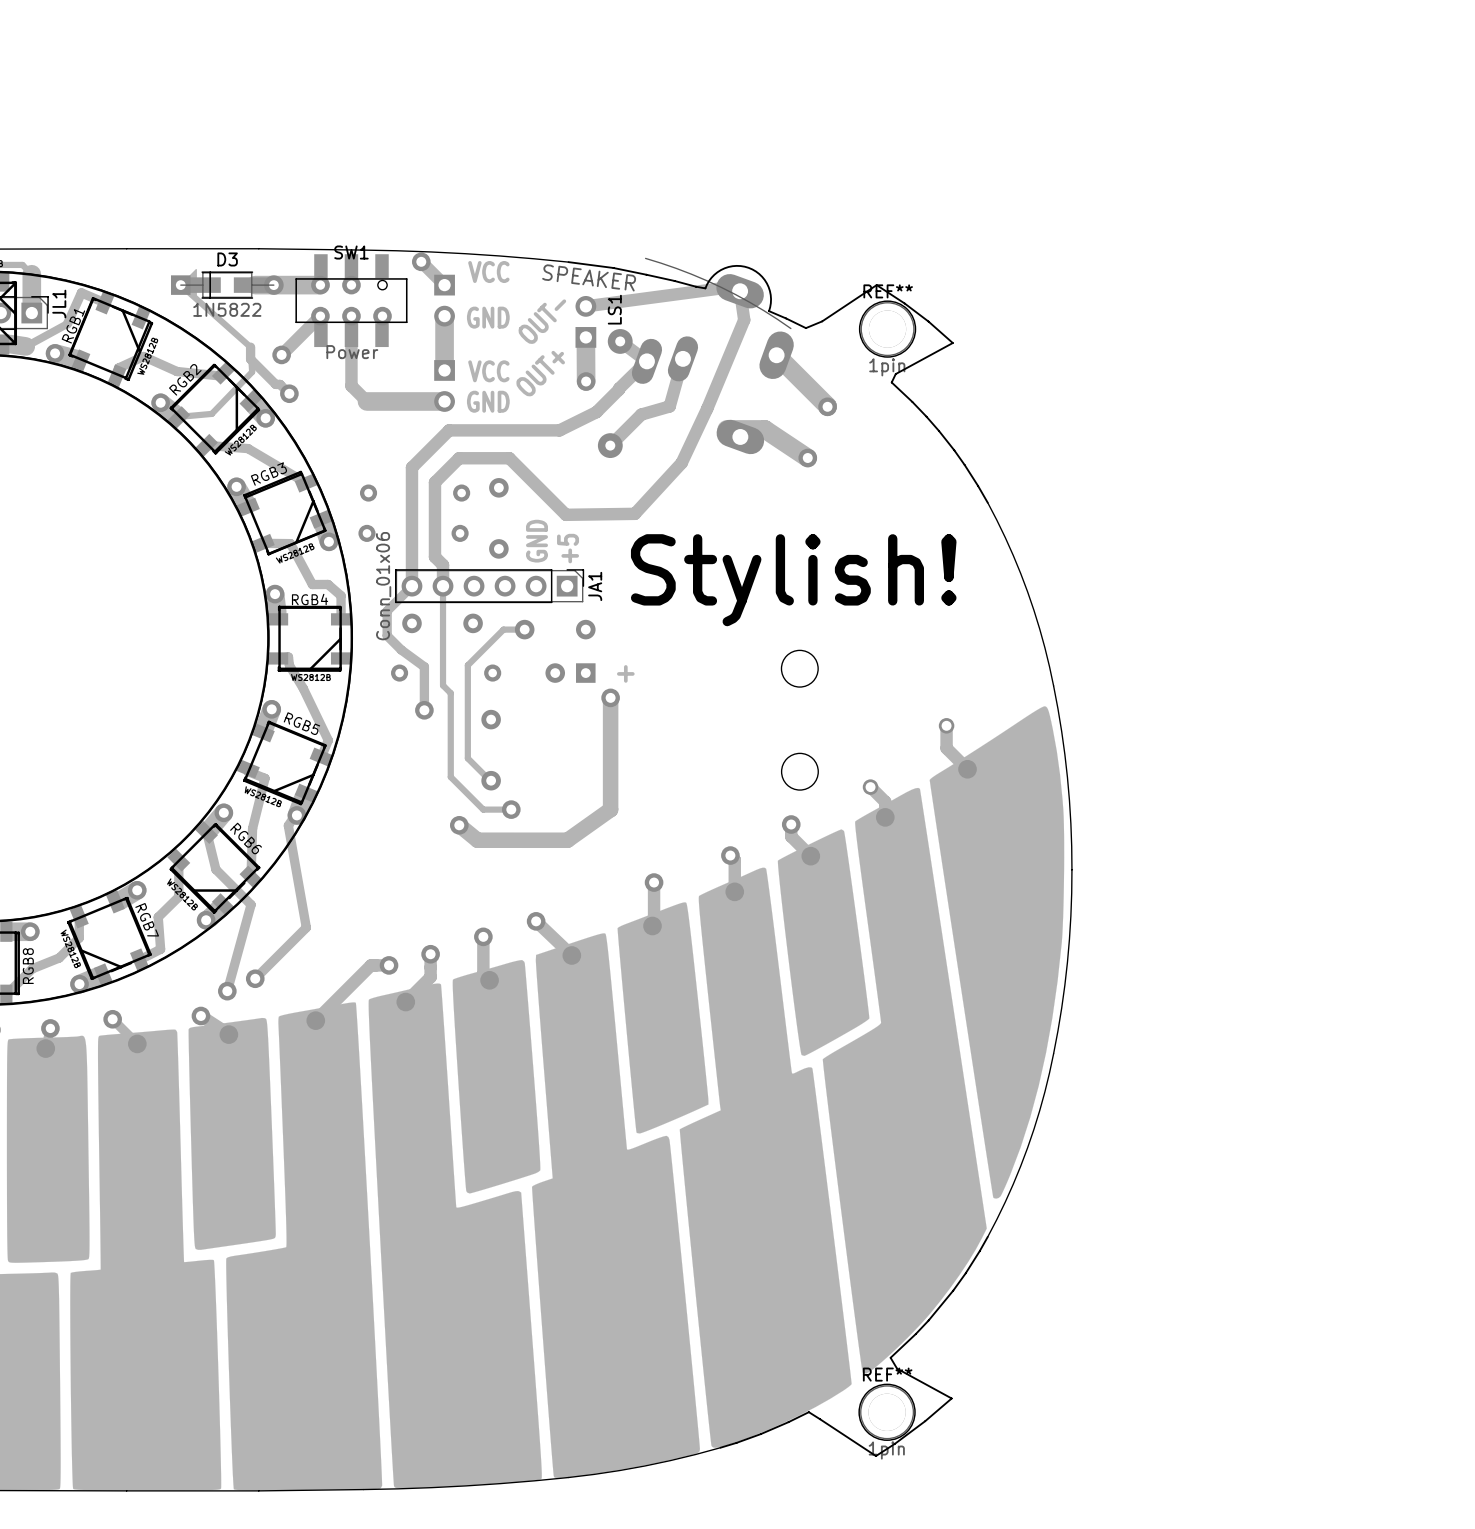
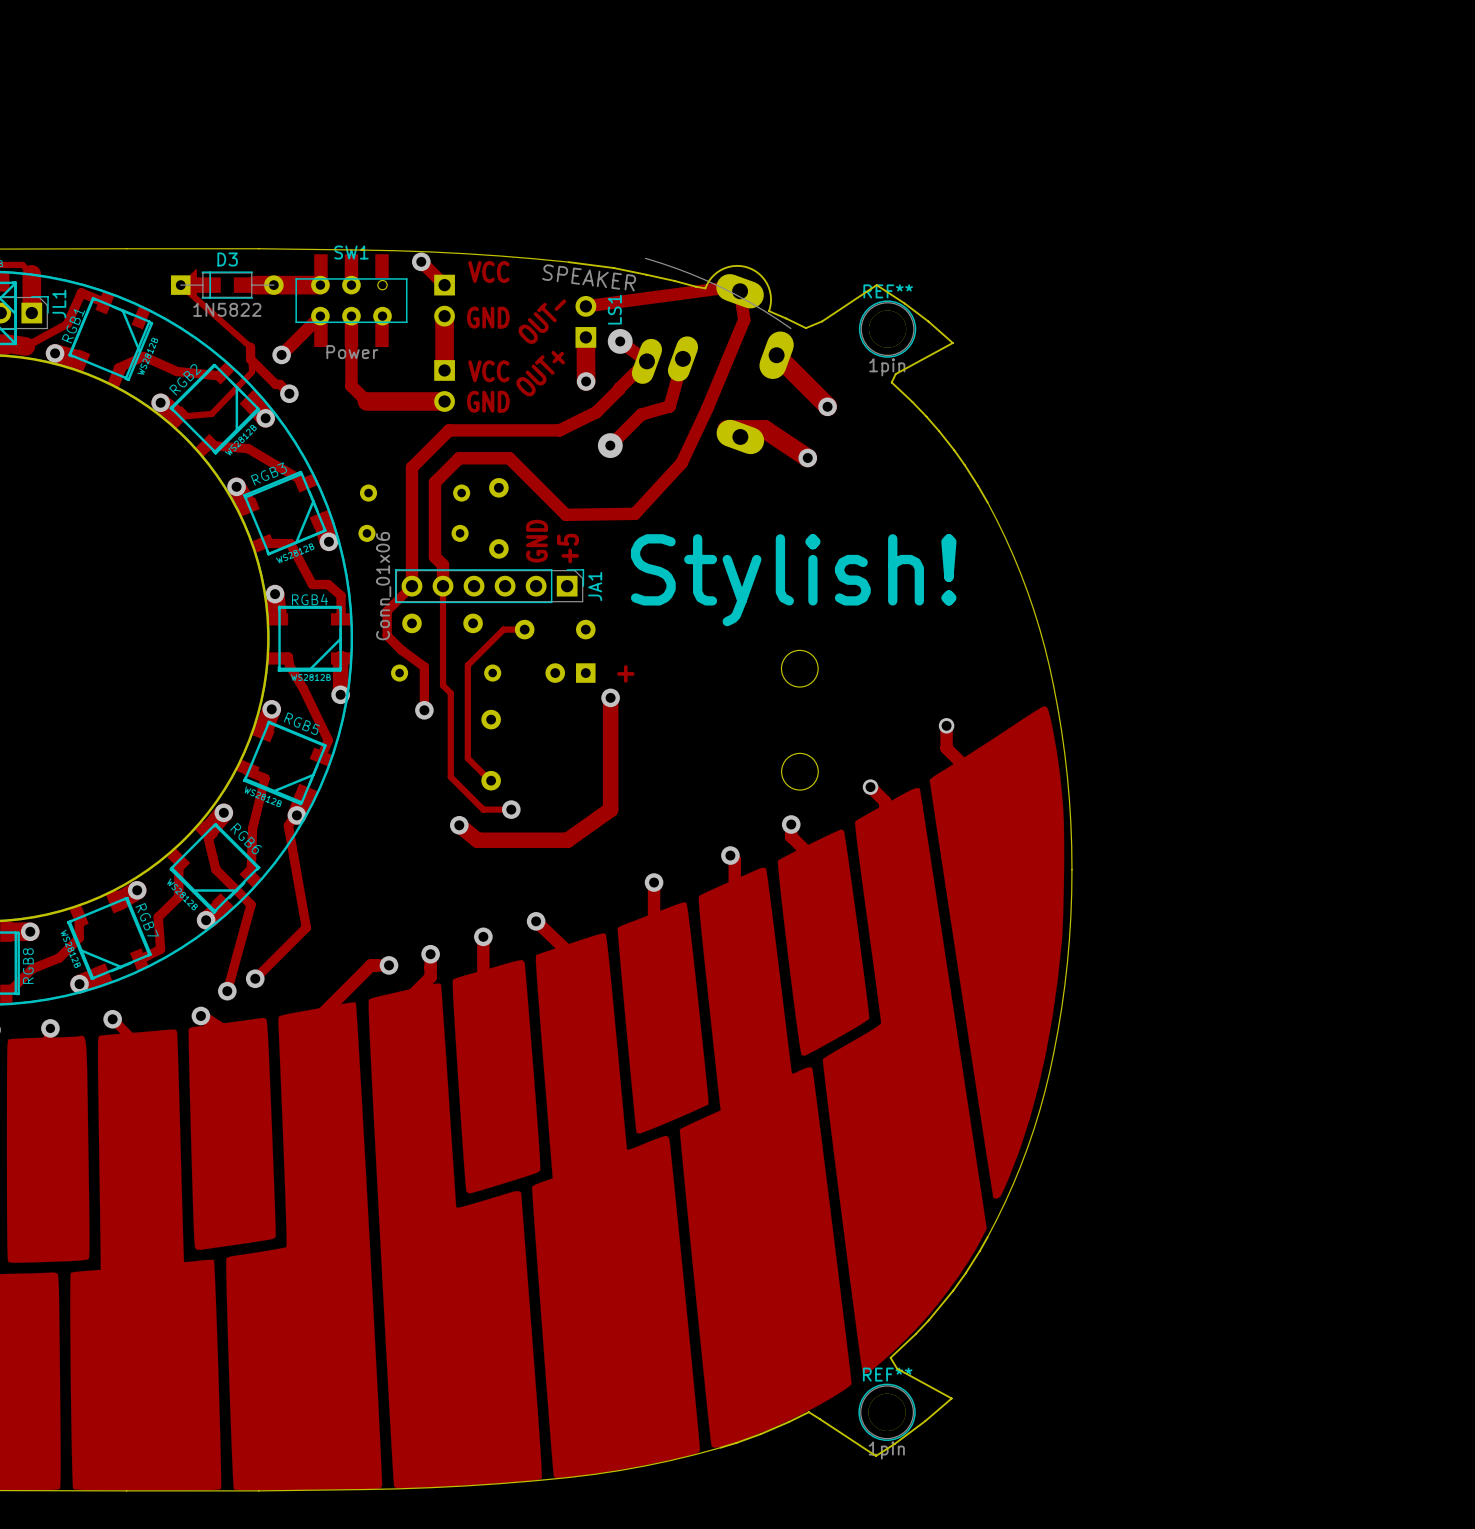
track: none -> (341, 658) (340, 694)
via: none -> (340, 694)

